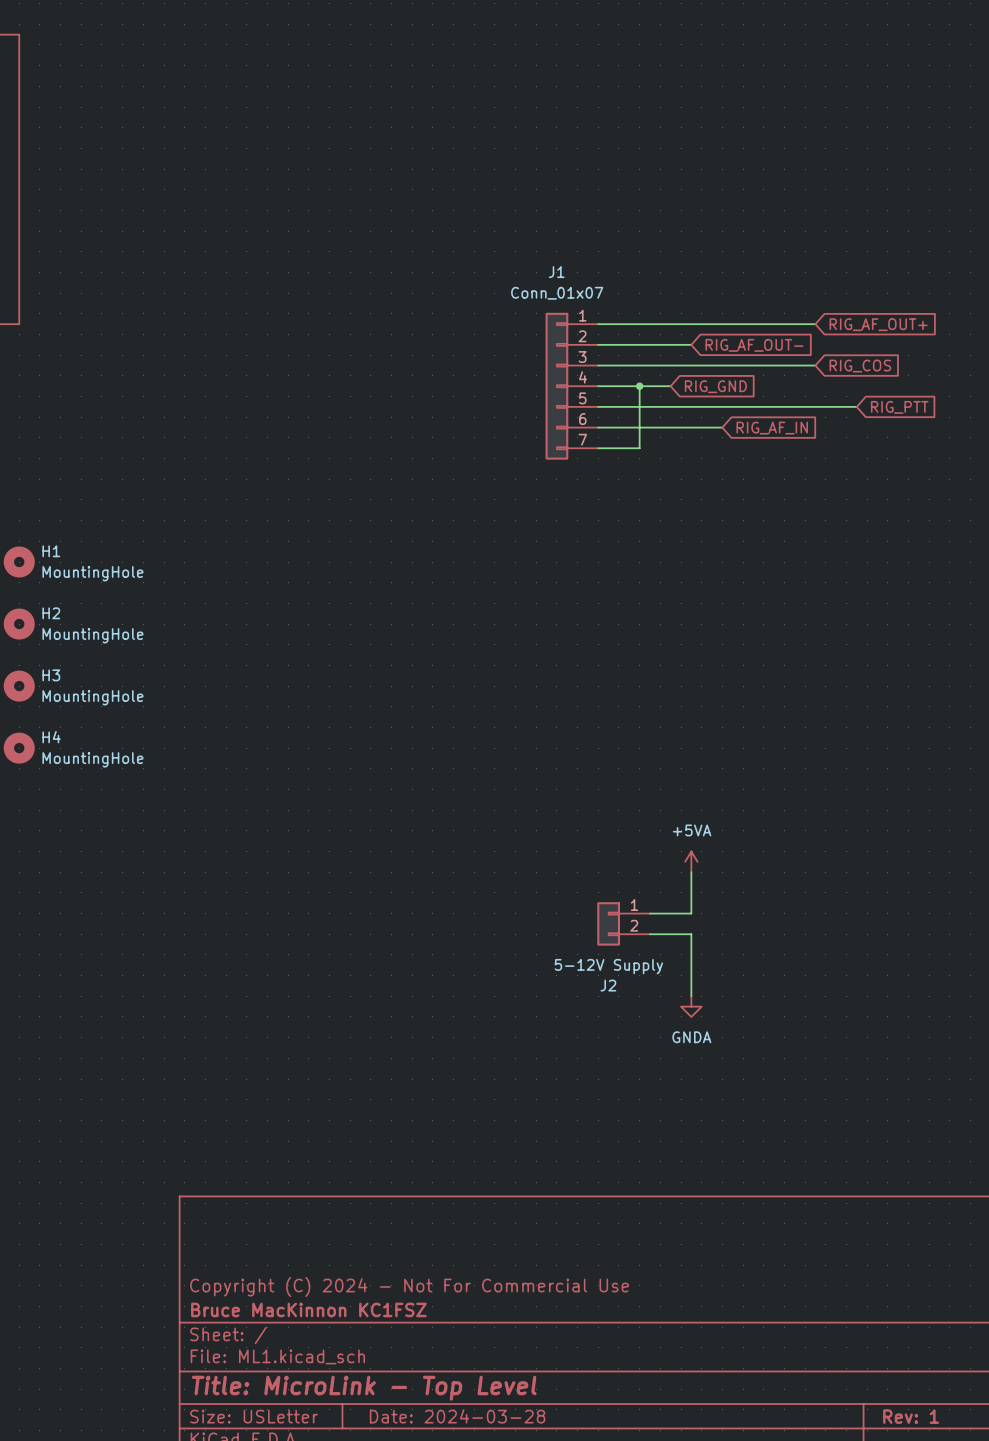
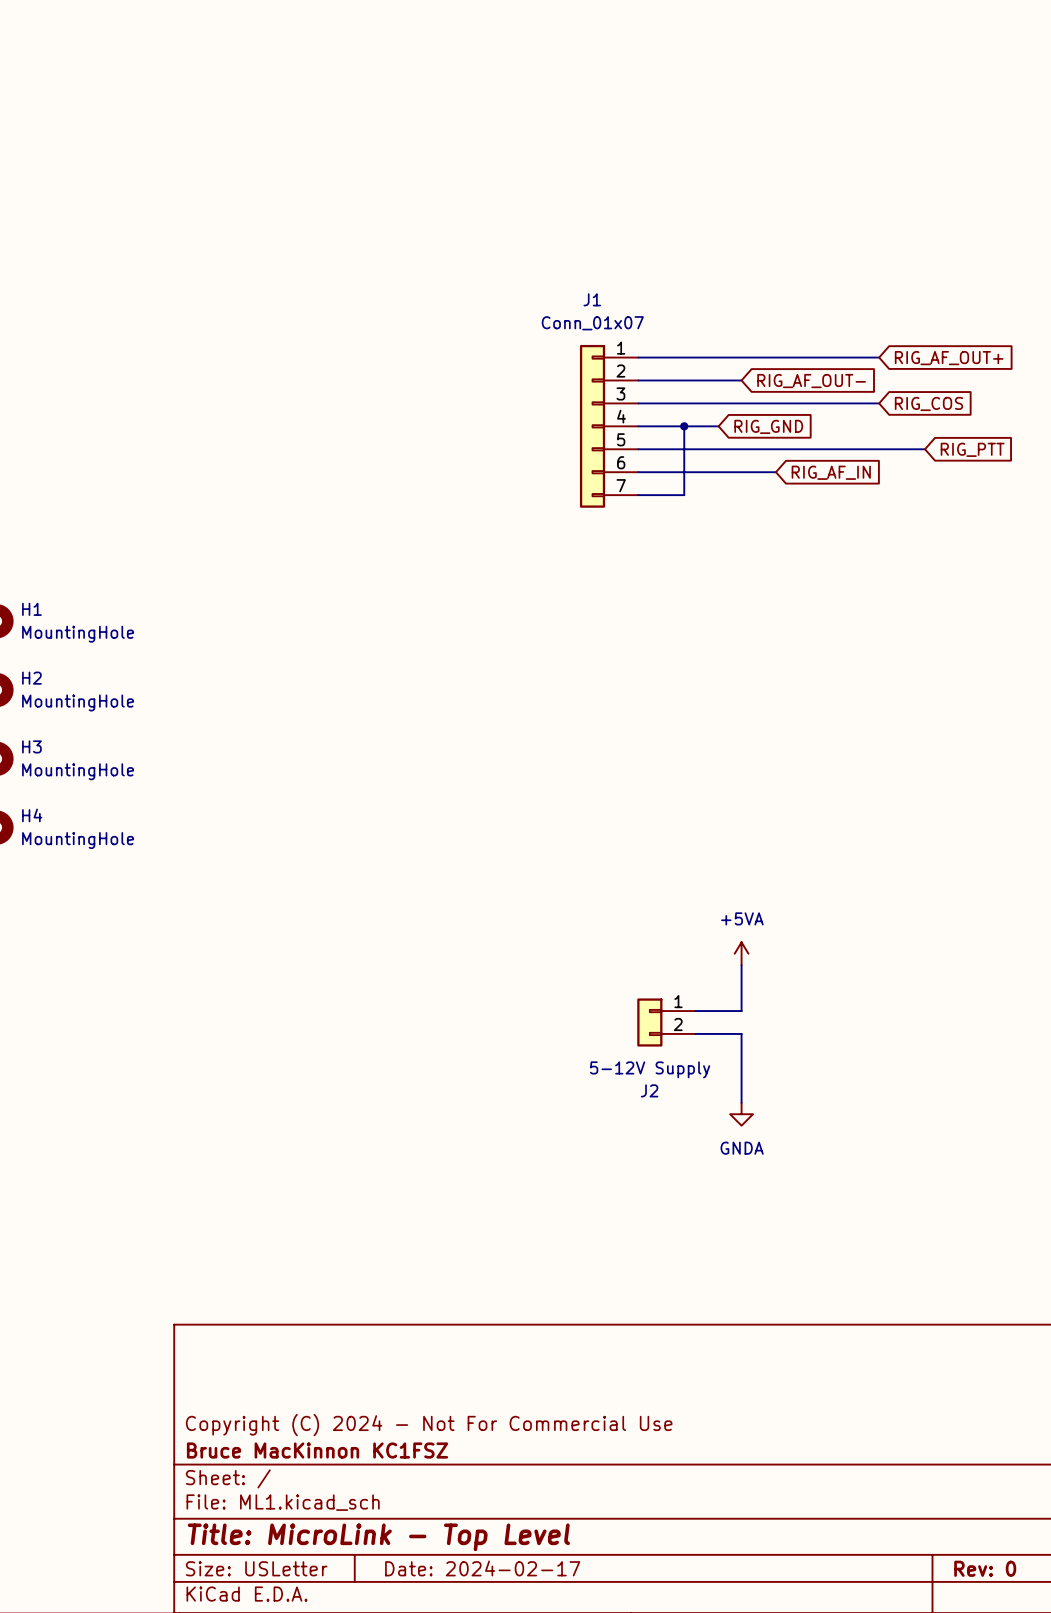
title block: Date: 2024-03-28 (457, 1416) -> Date: 2024-02-17 (482, 1568)
title block: Rev: 1 (911, 1416) -> Rev: 0 (985, 1568)

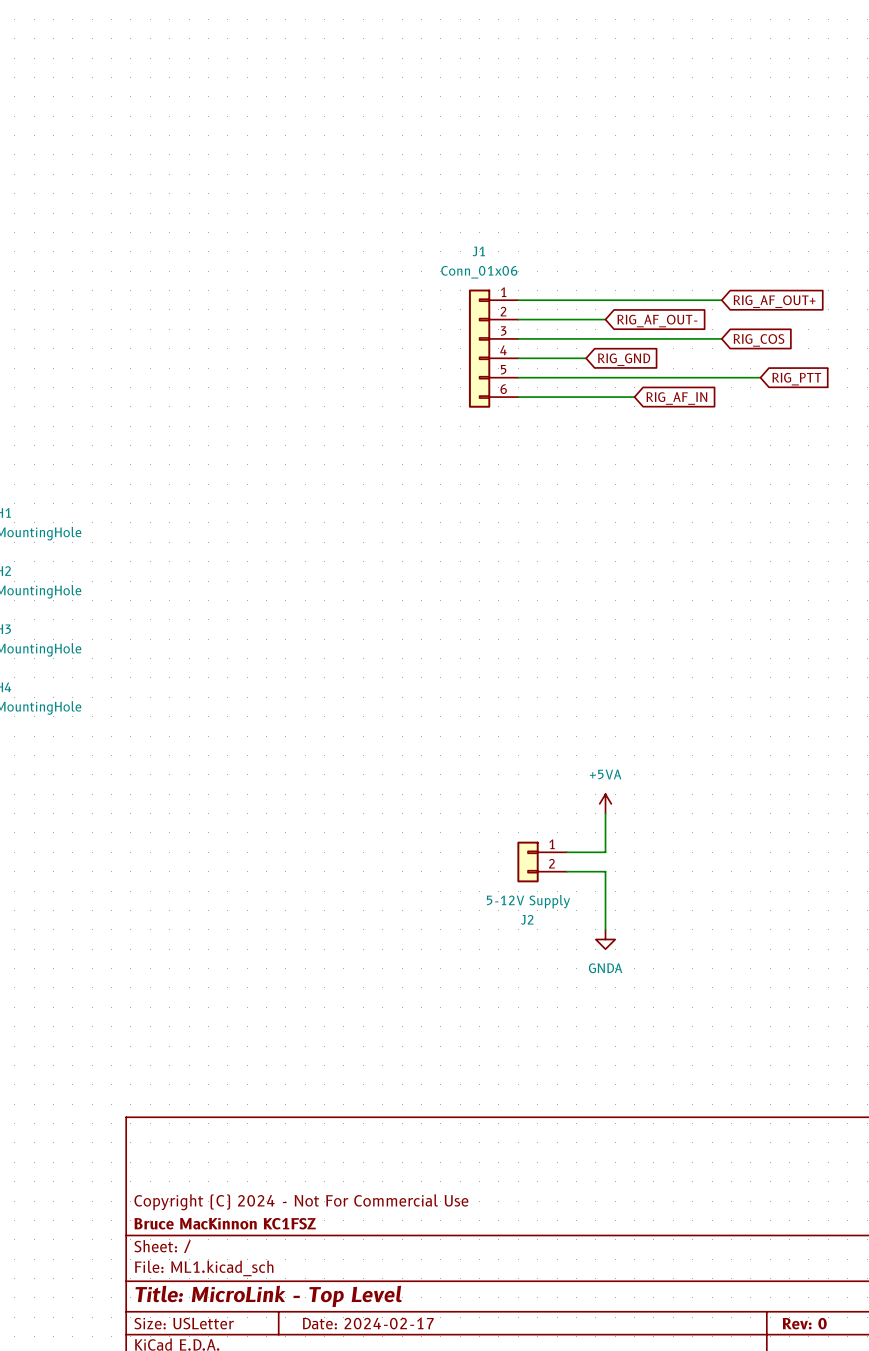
J1 value: Conn_01x07 (592, 323) -> Conn_01x06 (479, 272)
J1 symbol: [579, 344, 639, 508] -> [468, 289, 519, 408]
wire: (684, 426) (684, 495) (638, 495) -> none
junction: (684, 426) -> none

